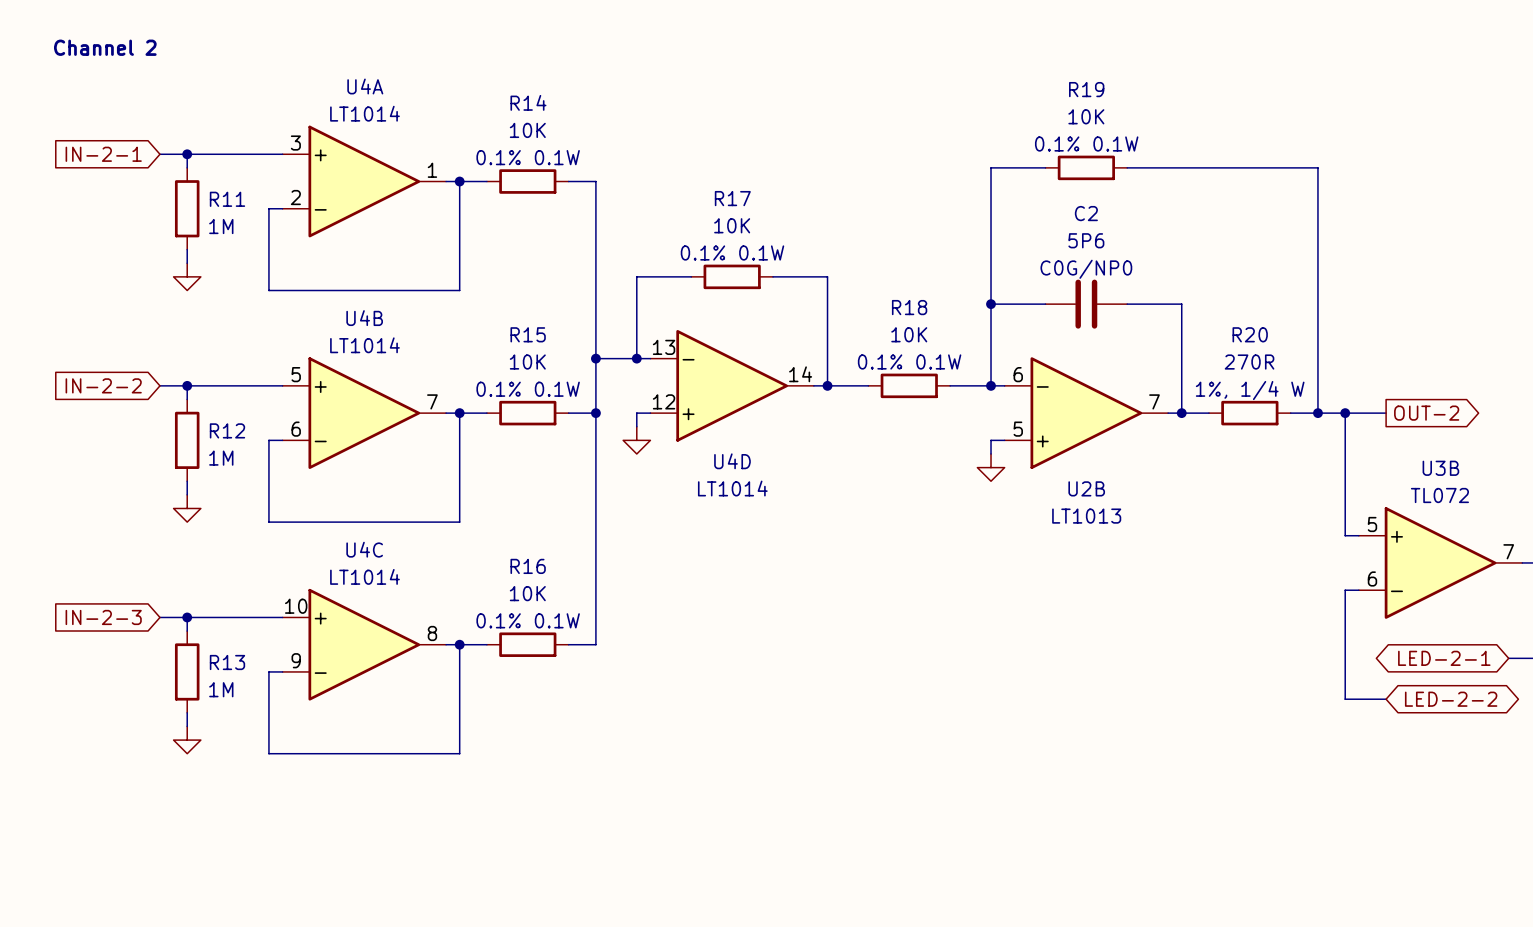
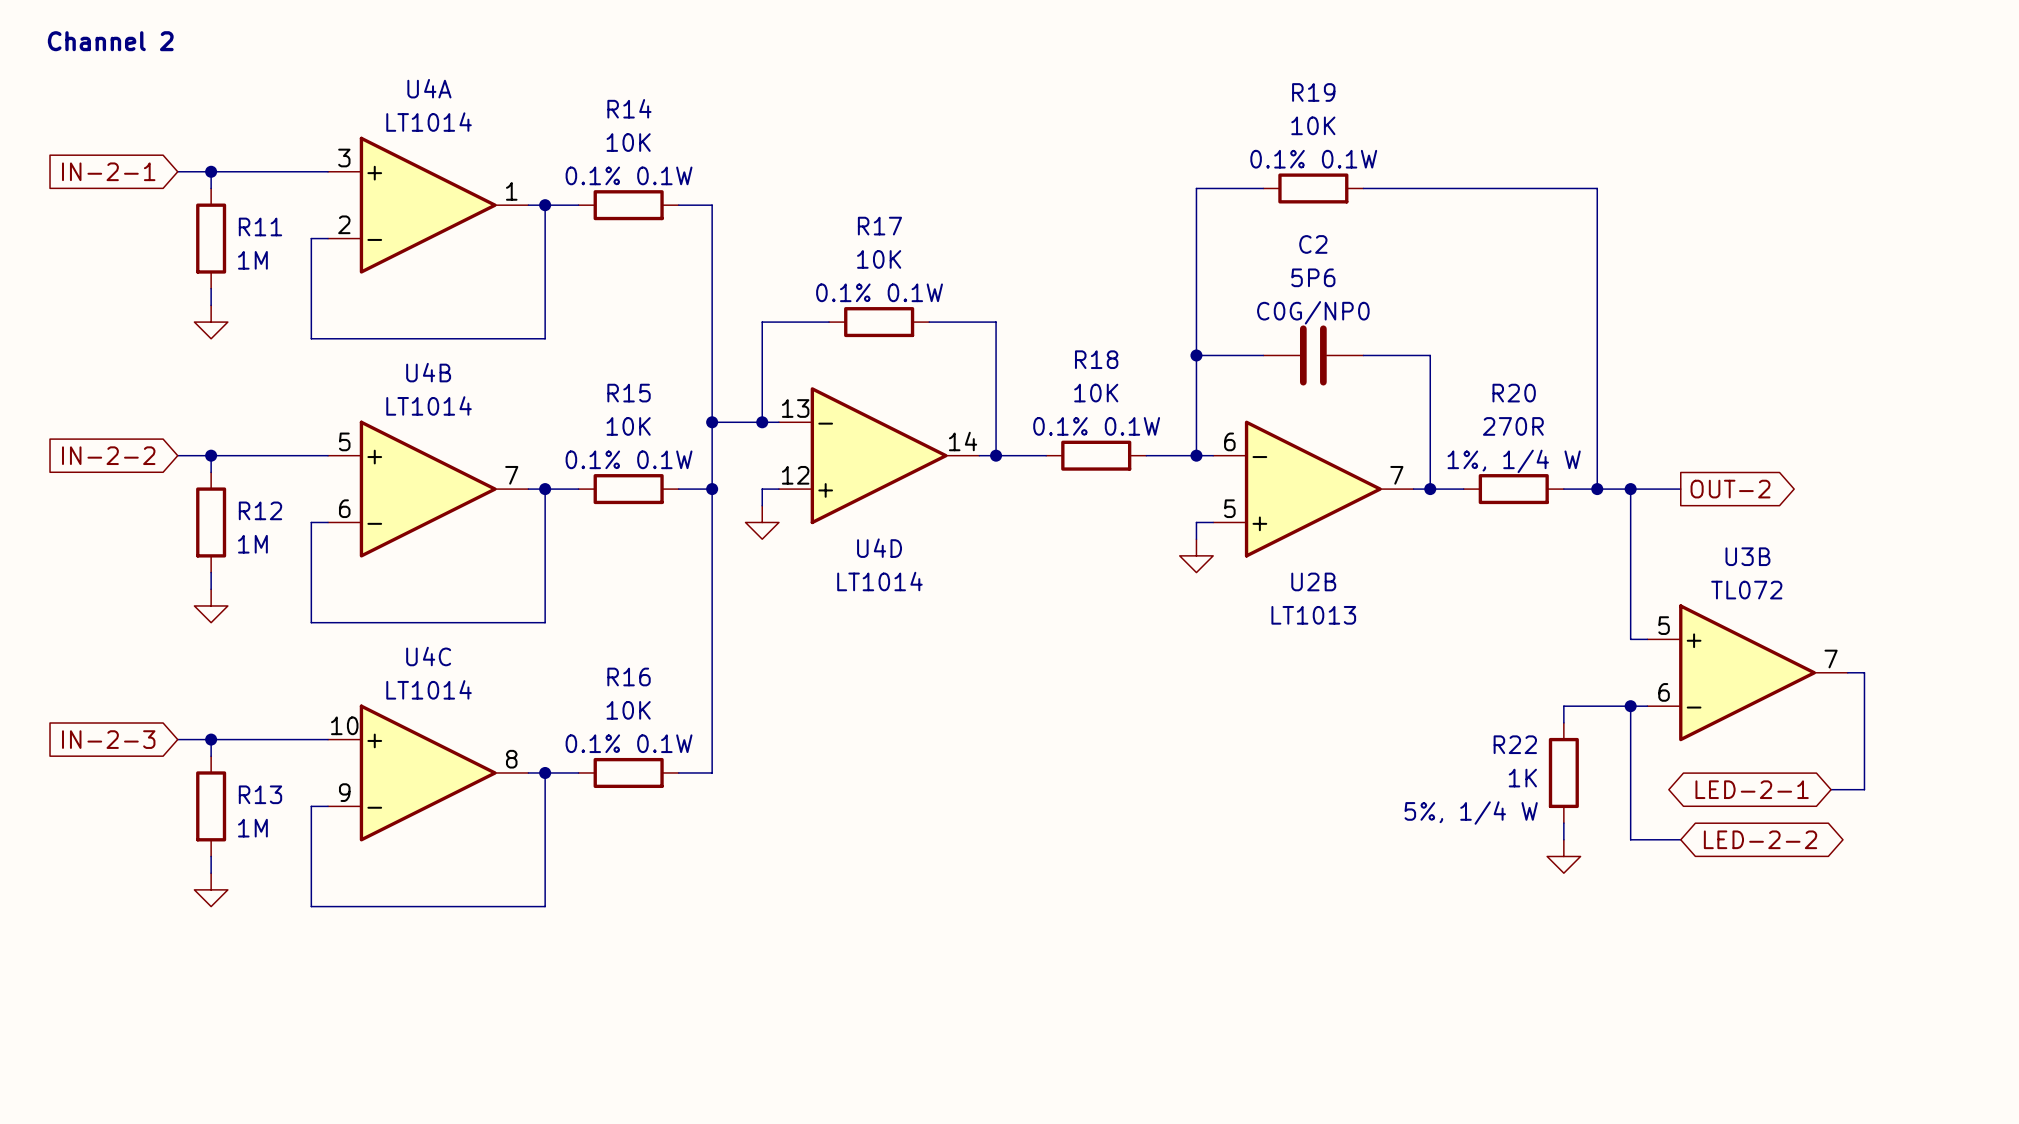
wire: none -> (1630, 706) (1563, 706) (1563, 722)
junction: none -> (1630, 706)
R22: none -> 1K (1563, 772)
wire: none -> (1563, 823) (1563, 839)
power symbol: none -> (1563, 856)

